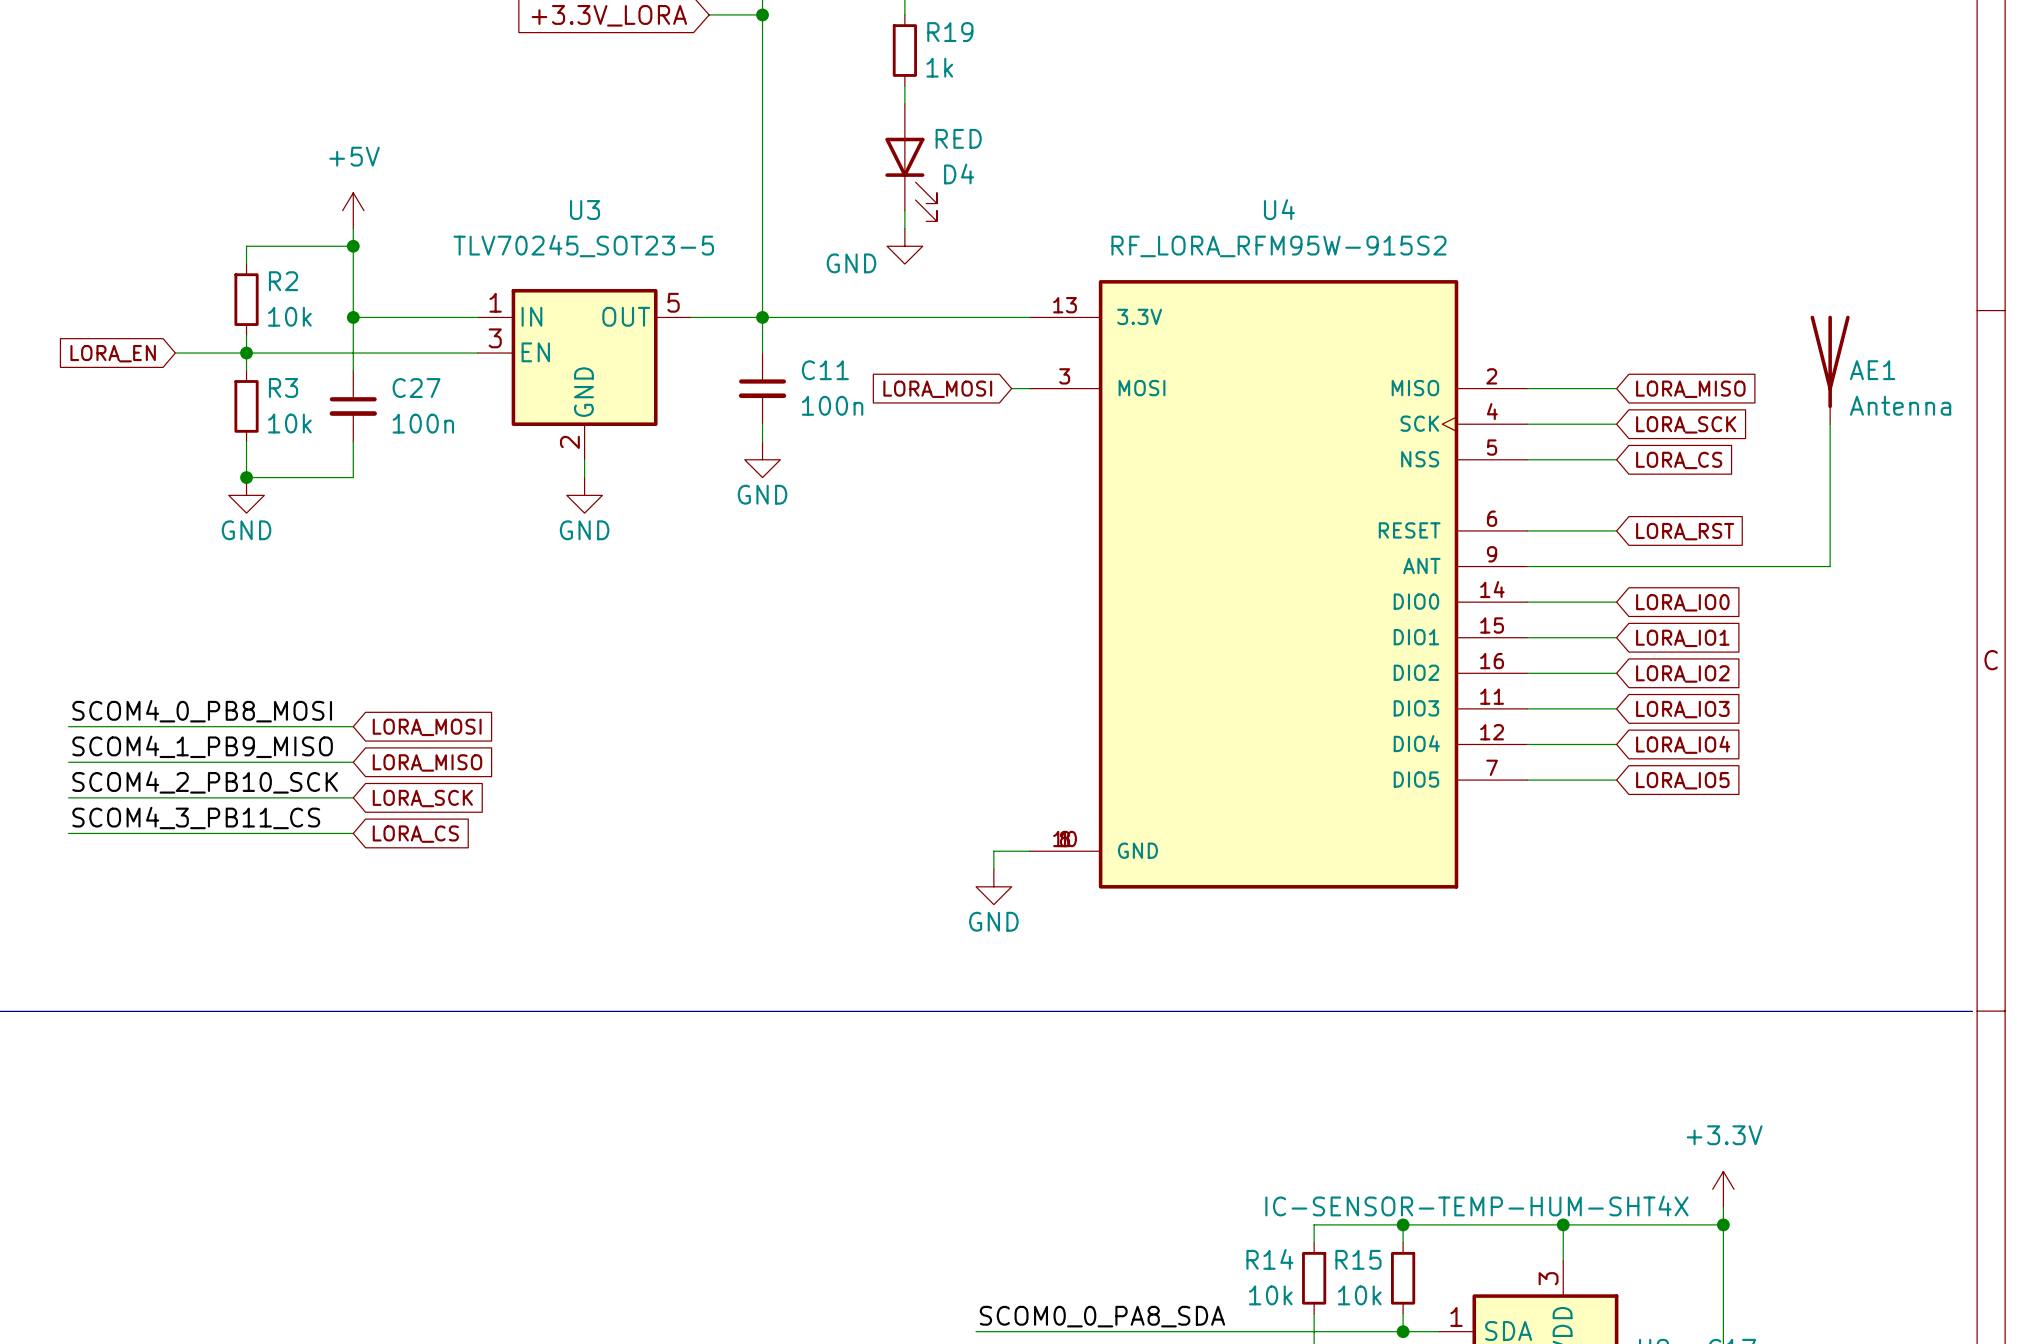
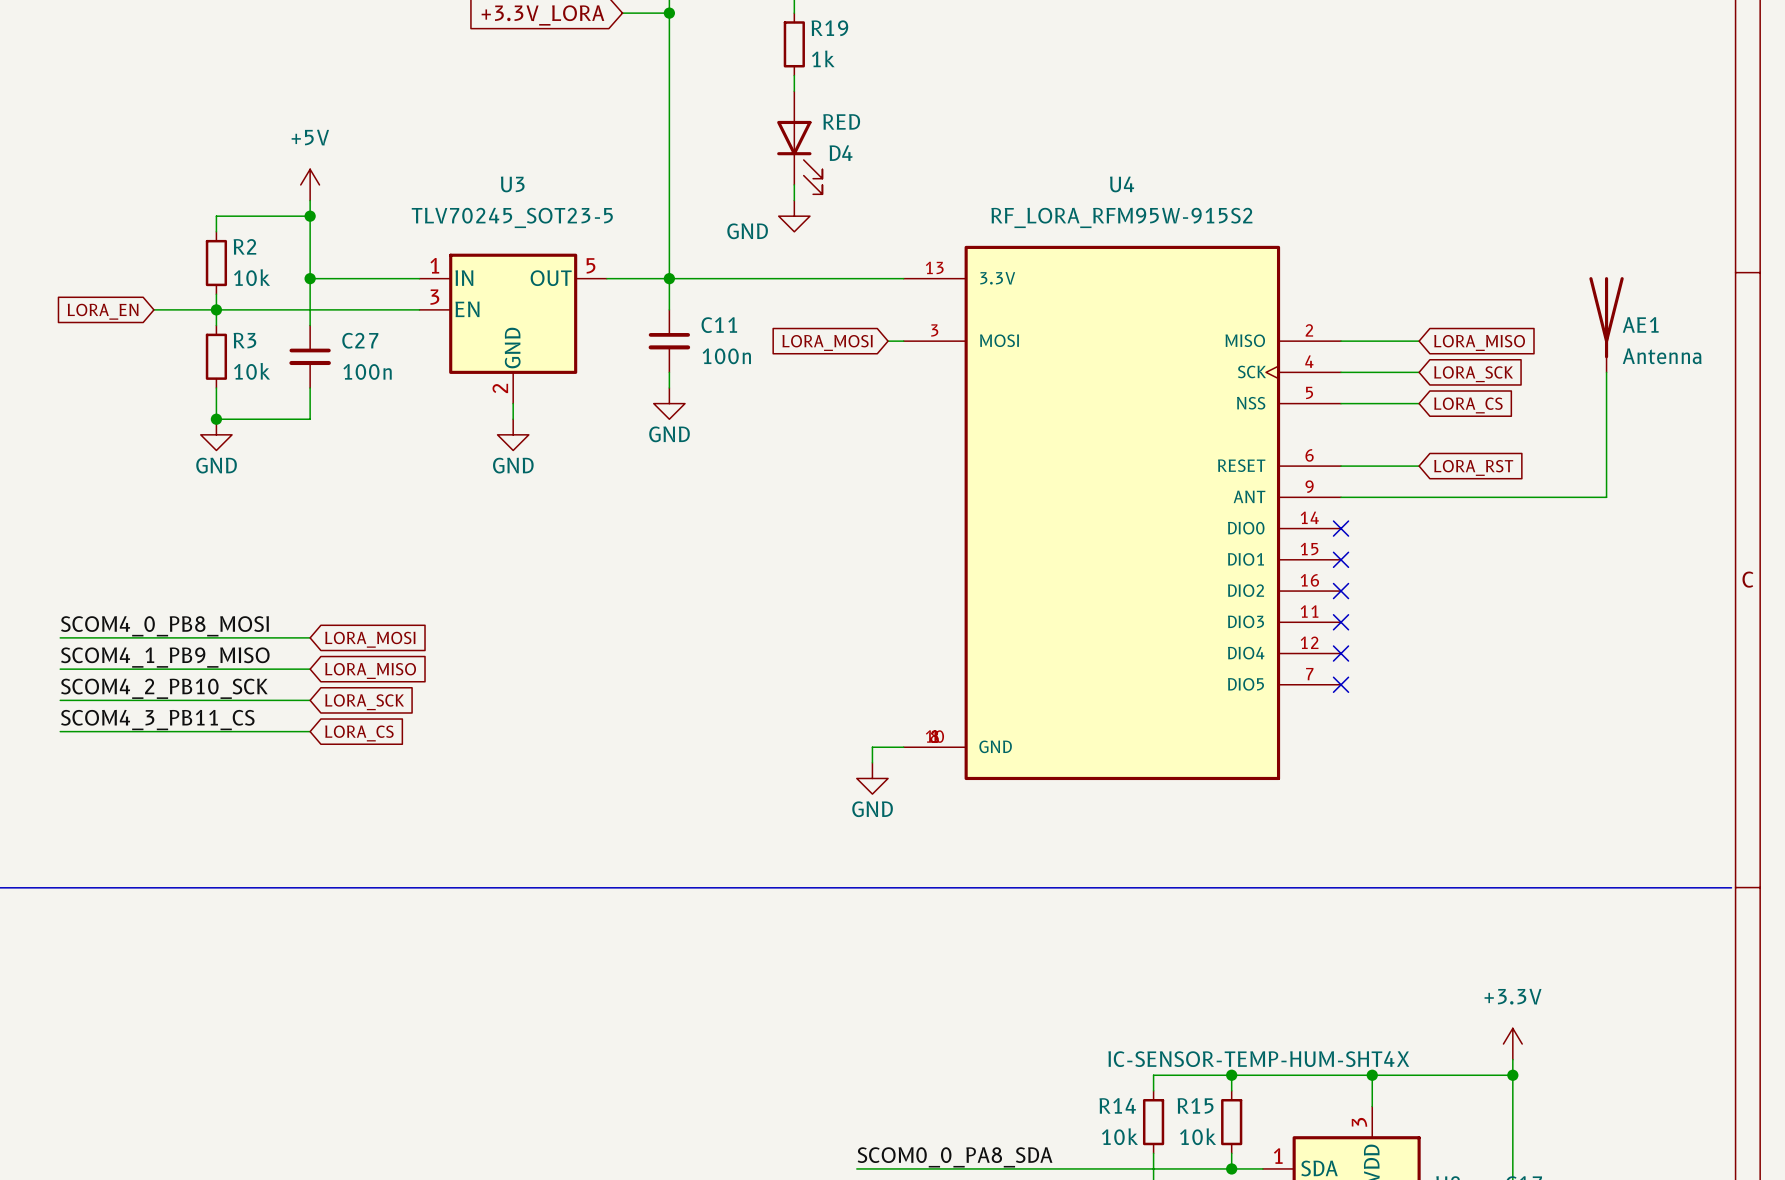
wire: (1527, 602) (1616, 602) -> none
no-connect mark: none -> (1341, 528)
global label: LORA_IO0 (1682, 602) -> none
wire: (1527, 637) (1616, 637) -> none
no-connect mark: none -> (1341, 559)
global label: LORA_IO1 (1682, 638) -> none
wire: (1527, 673) (1616, 673) -> none
no-connect mark: none -> (1341, 591)
global label: LORA_IO2 (1682, 673) -> none
wire: (1527, 708) (1616, 708) -> none
no-connect mark: none -> (1341, 622)
global label: LORA_IO3 (1682, 709) -> none
wire: (1527, 744) (1616, 744) -> none
no-connect mark: none -> (1341, 653)
global label: LORA_IO4 (1683, 744) -> none
wire: (1527, 780) (1616, 780) -> none
no-connect mark: none -> (1341, 684)
global label: LORA_IO5 (1682, 780) -> none

